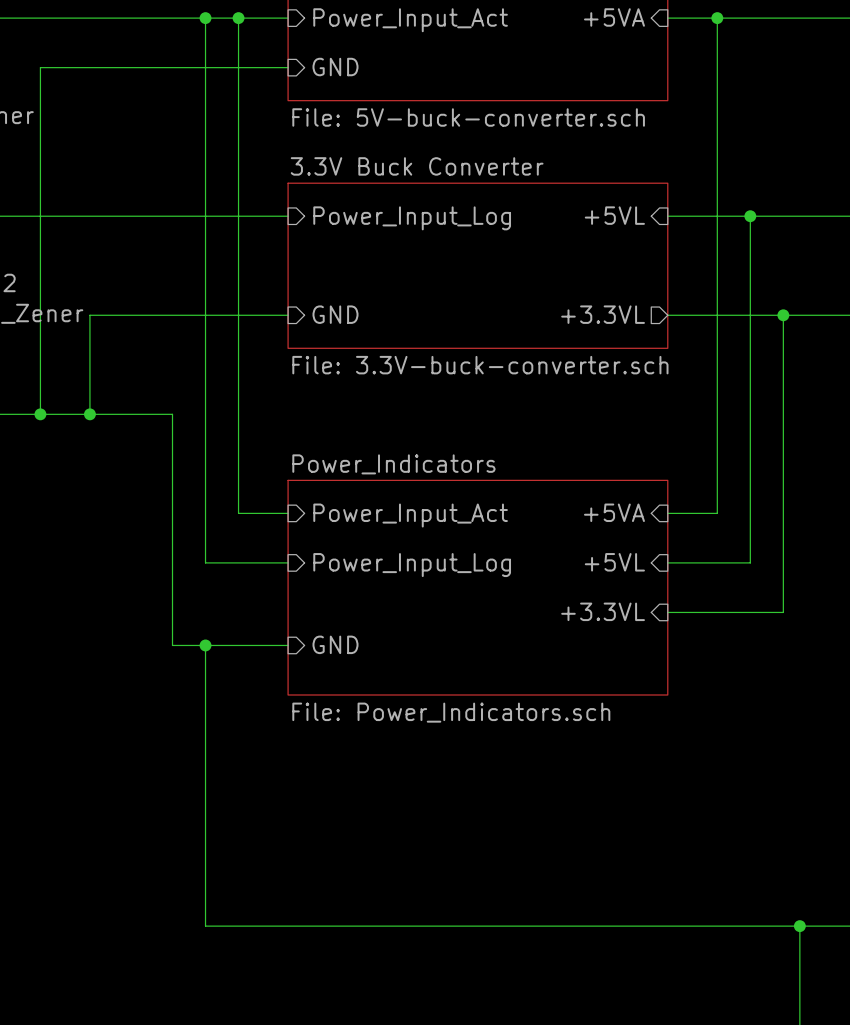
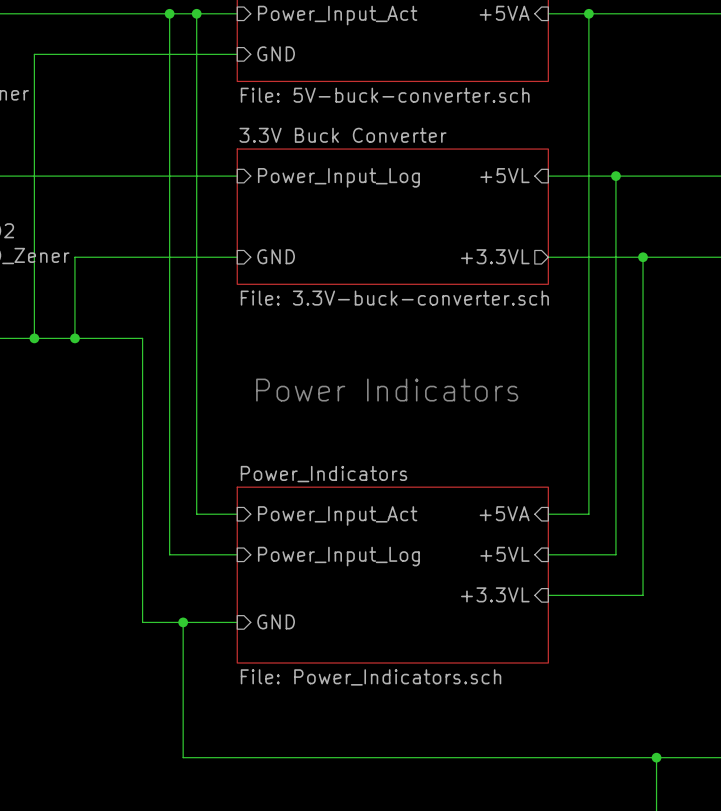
text: none -> Power Indicators (387, 390)
sheet pin position: +5VA (614, 512) -> +5VA (504, 513)
wire: (238, 513) (288, 513) -> (196, 419) (196, 514) (237, 514)
wire: (667, 513) (717, 513) -> (548, 514) (588, 514) (588, 419)
sheet pin position: Power_Input_Act (410, 515) -> Power_Input_Act (337, 515)
wire: (205, 562) (288, 562) -> (169, 460) (169, 527)
sheet pin position: +5VL (614, 562) -> +5VL (504, 554)
wire: (667, 562) (750, 562) -> (548, 554) (615, 554) (615, 460)
sheet pin position: Power_Input_Log (412, 565) -> Power_Input_Log (338, 556)
sheet Power_Indicators position: (477, 587) -> (392, 575)
sheet pin position: +3.3VL (603, 611) -> +3.3VL (495, 594)
wire: (667, 612) (783, 612) -> (548, 595) (643, 595) (643, 500)
sheet pin position: GND (335, 644) -> GND (276, 621)
wire: (172, 645) (288, 645) -> (142, 527) (142, 622) (237, 622)
junction: (205, 645) -> none
wire: (205, 678) (205, 926) (222, 926) -> (183, 622) (183, 757)
wire: none -> (169, 554) (237, 554)
junction: none -> (183, 622)

